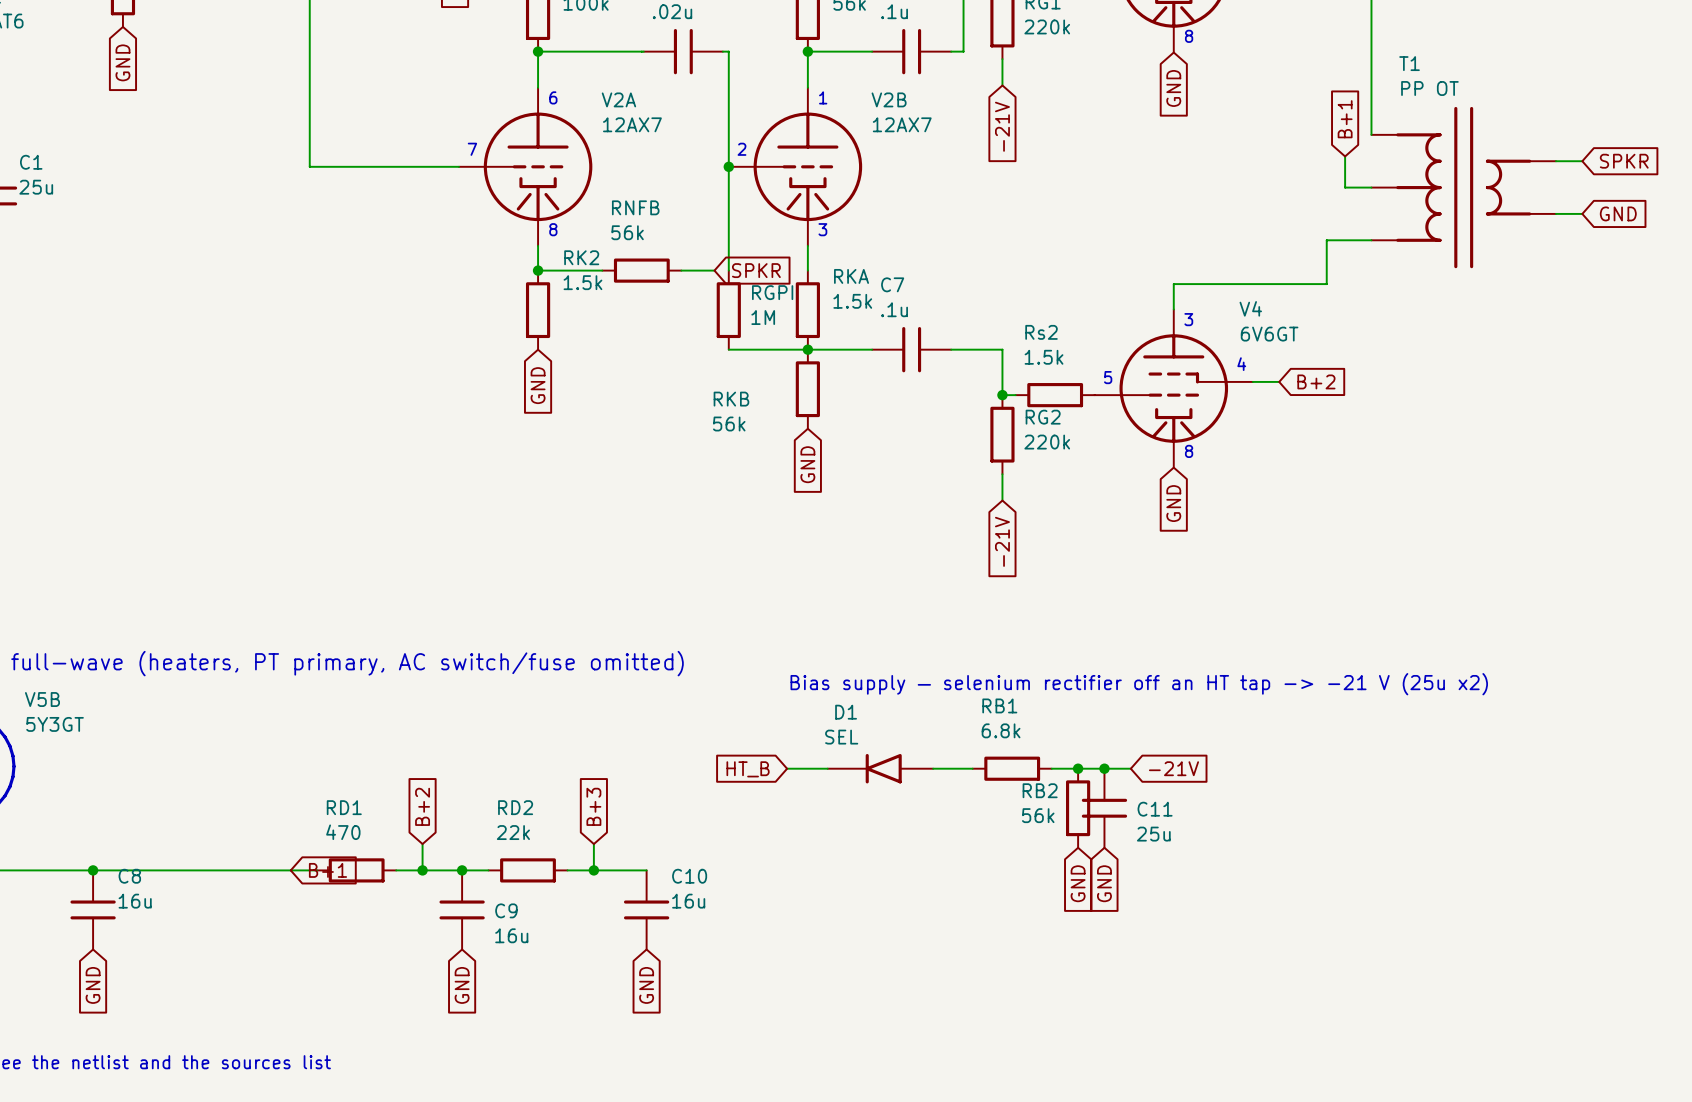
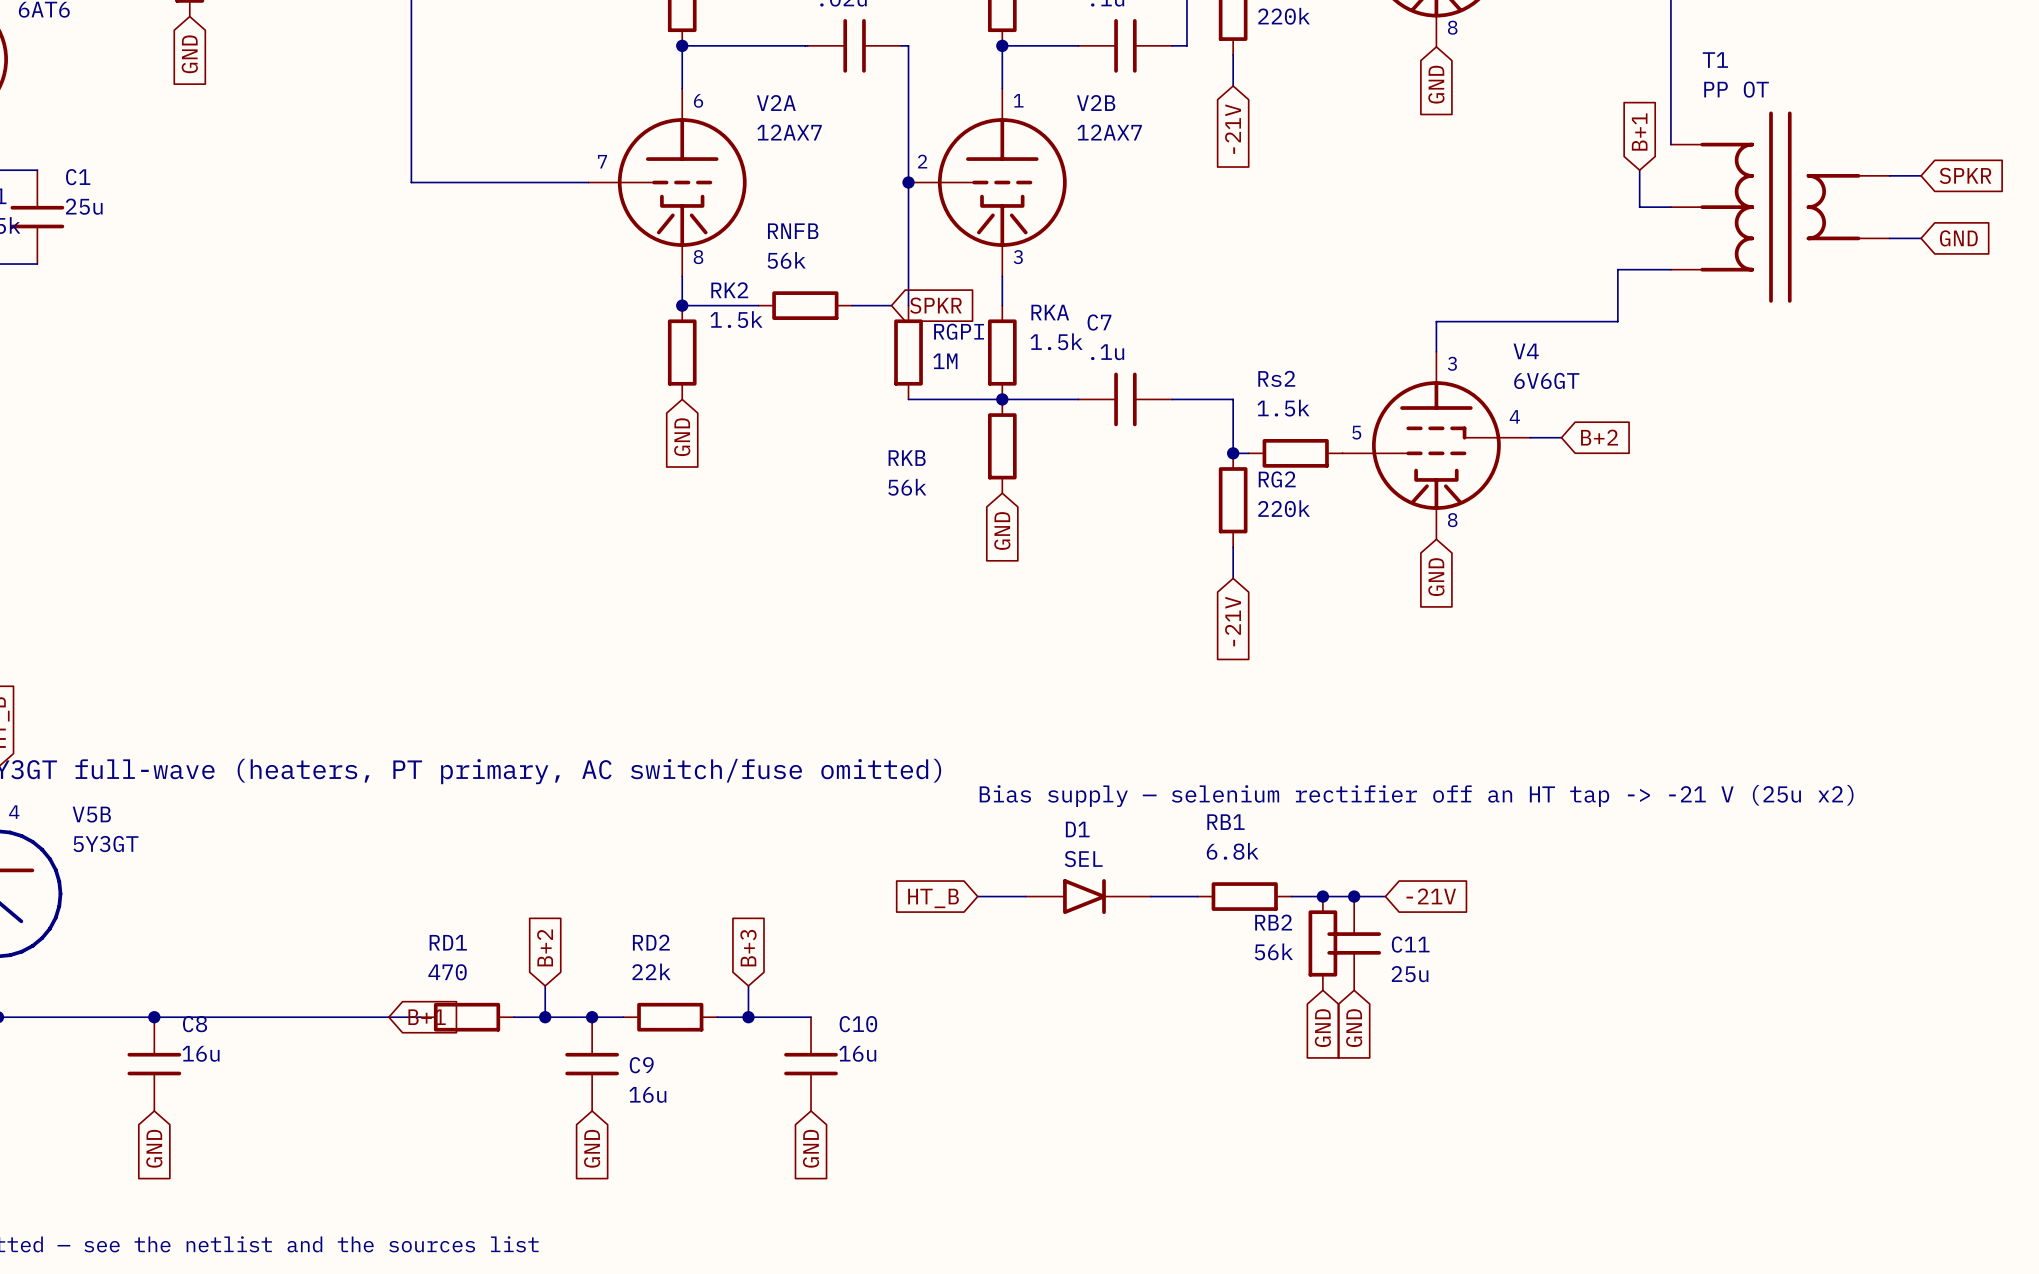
D1 name position: D1 (846, 712) -> D1 (1077, 829)
D1 value position: SEL (841, 737) -> SEL (1083, 859)
D1 rotation: 0° (883, 768) -> 180° (1084, 896)

